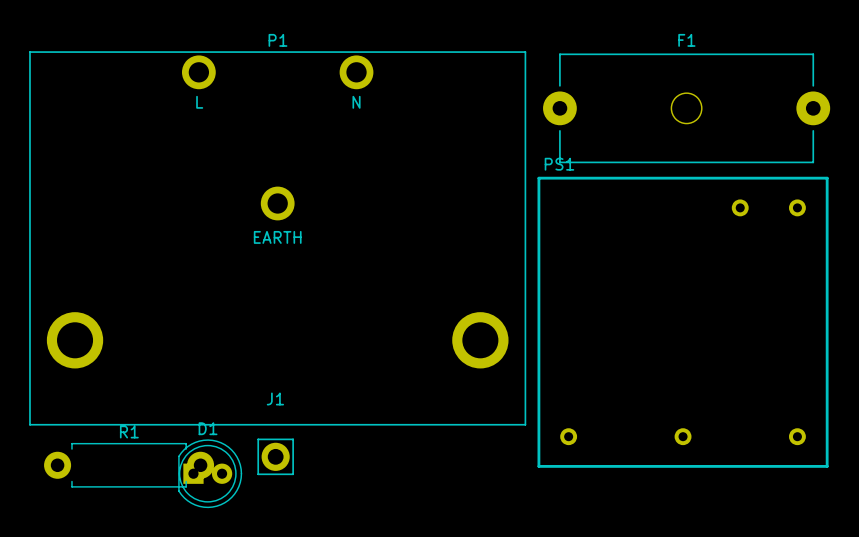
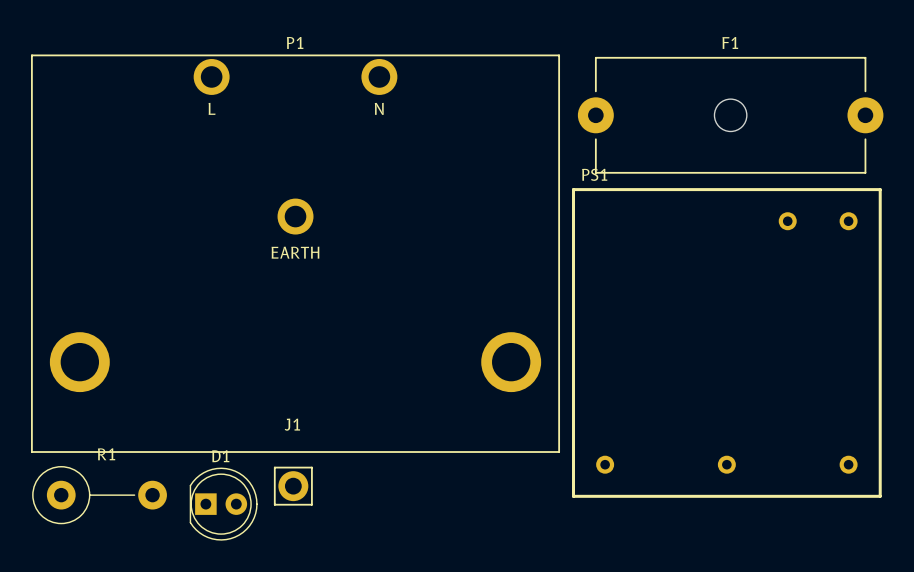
R1 footprint: [44, 442, 215, 488] -> [32, 466, 167, 525]

